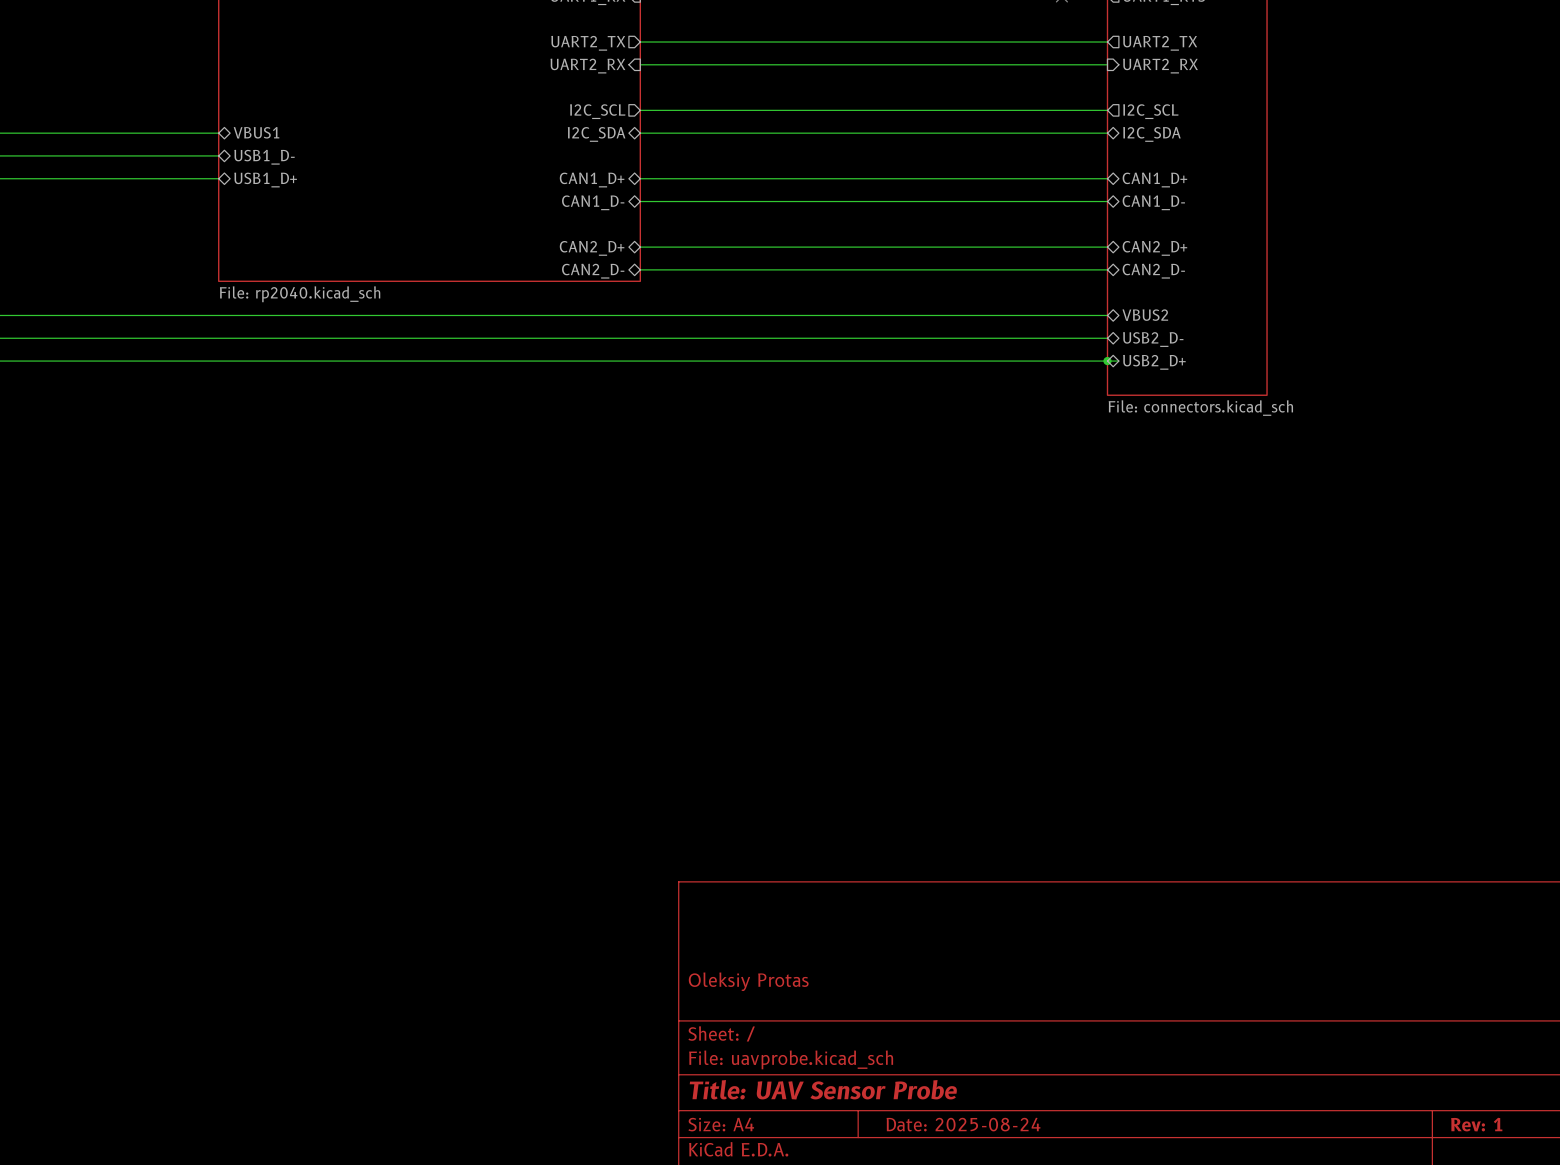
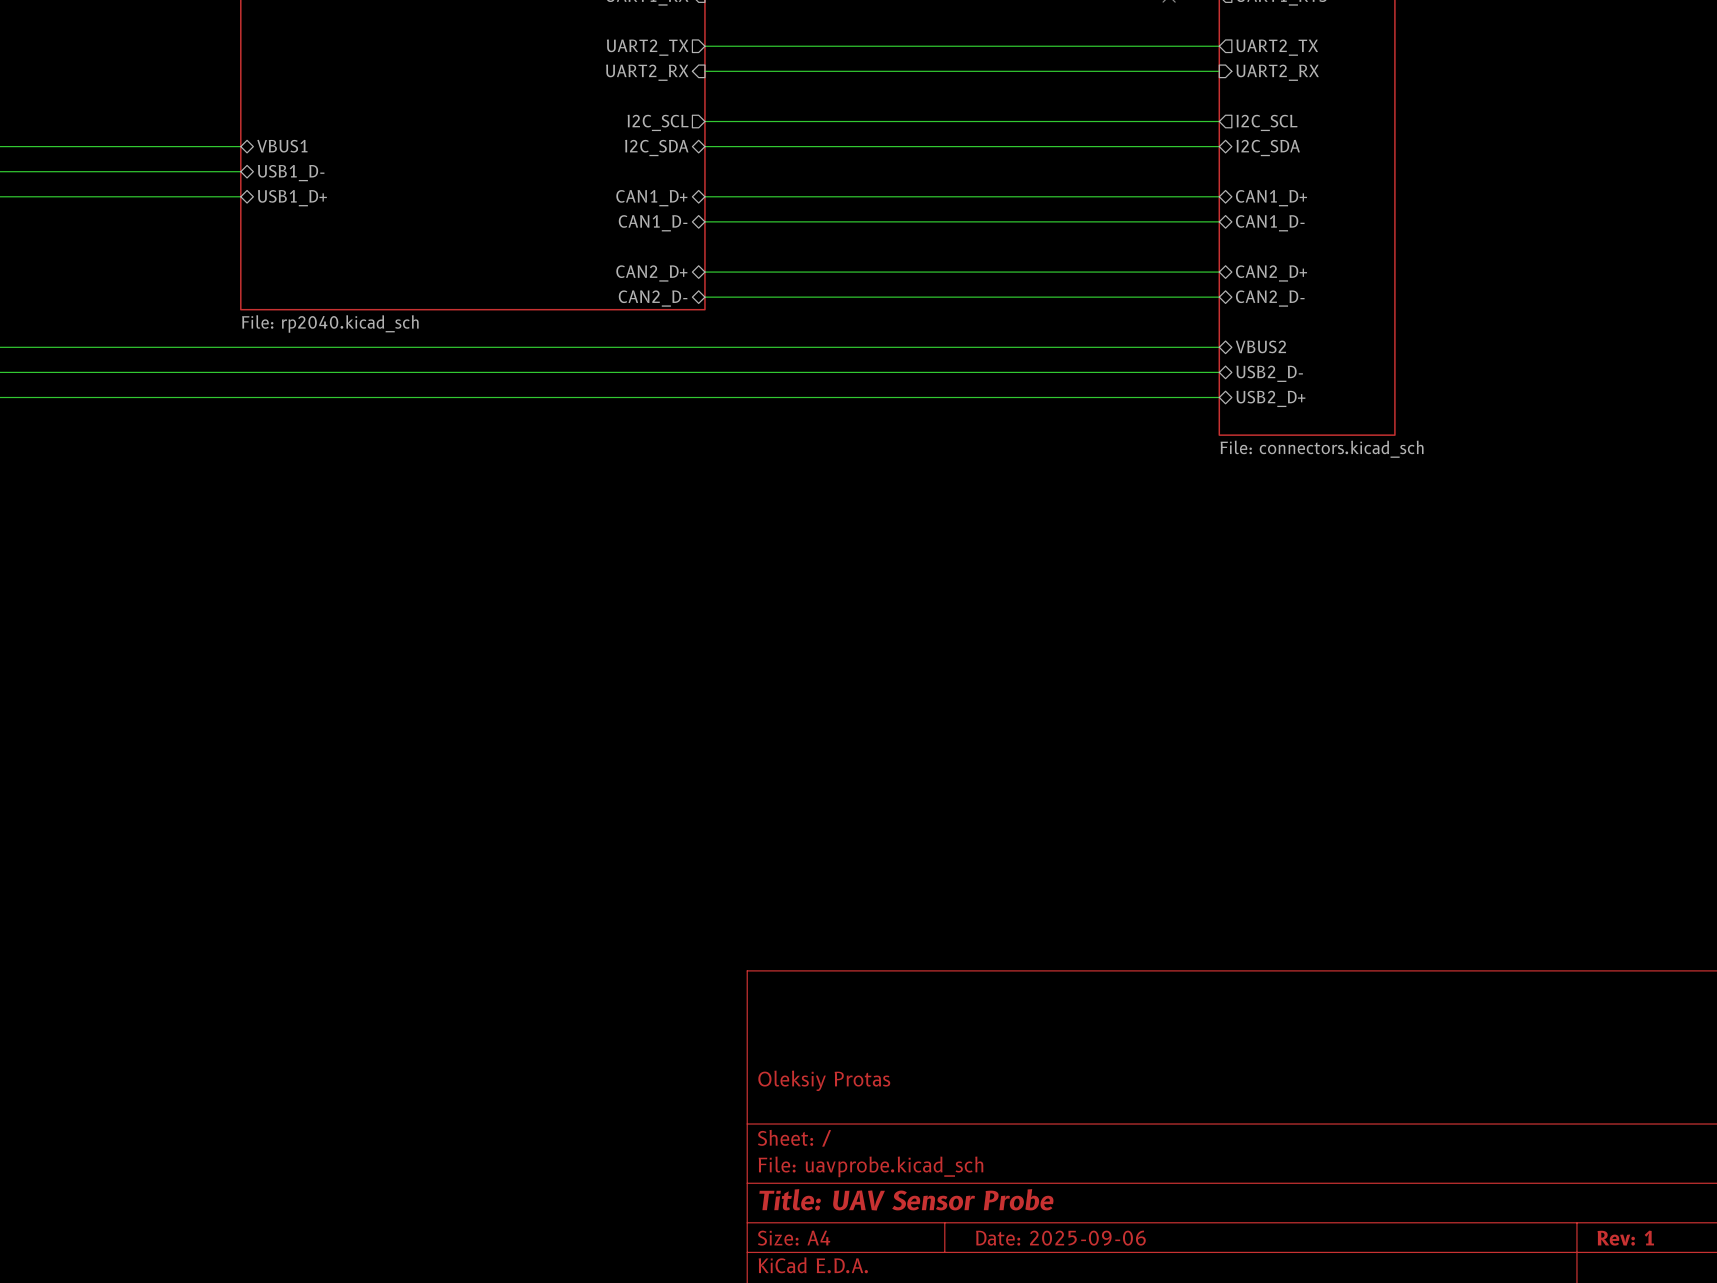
wire: (1107, 361) (1118, 361) -> none
junction: (1107, 361) -> none
title block: Date: 2025-08-24 (963, 1124) -> Date: 2025-09-06 (1060, 1238)

